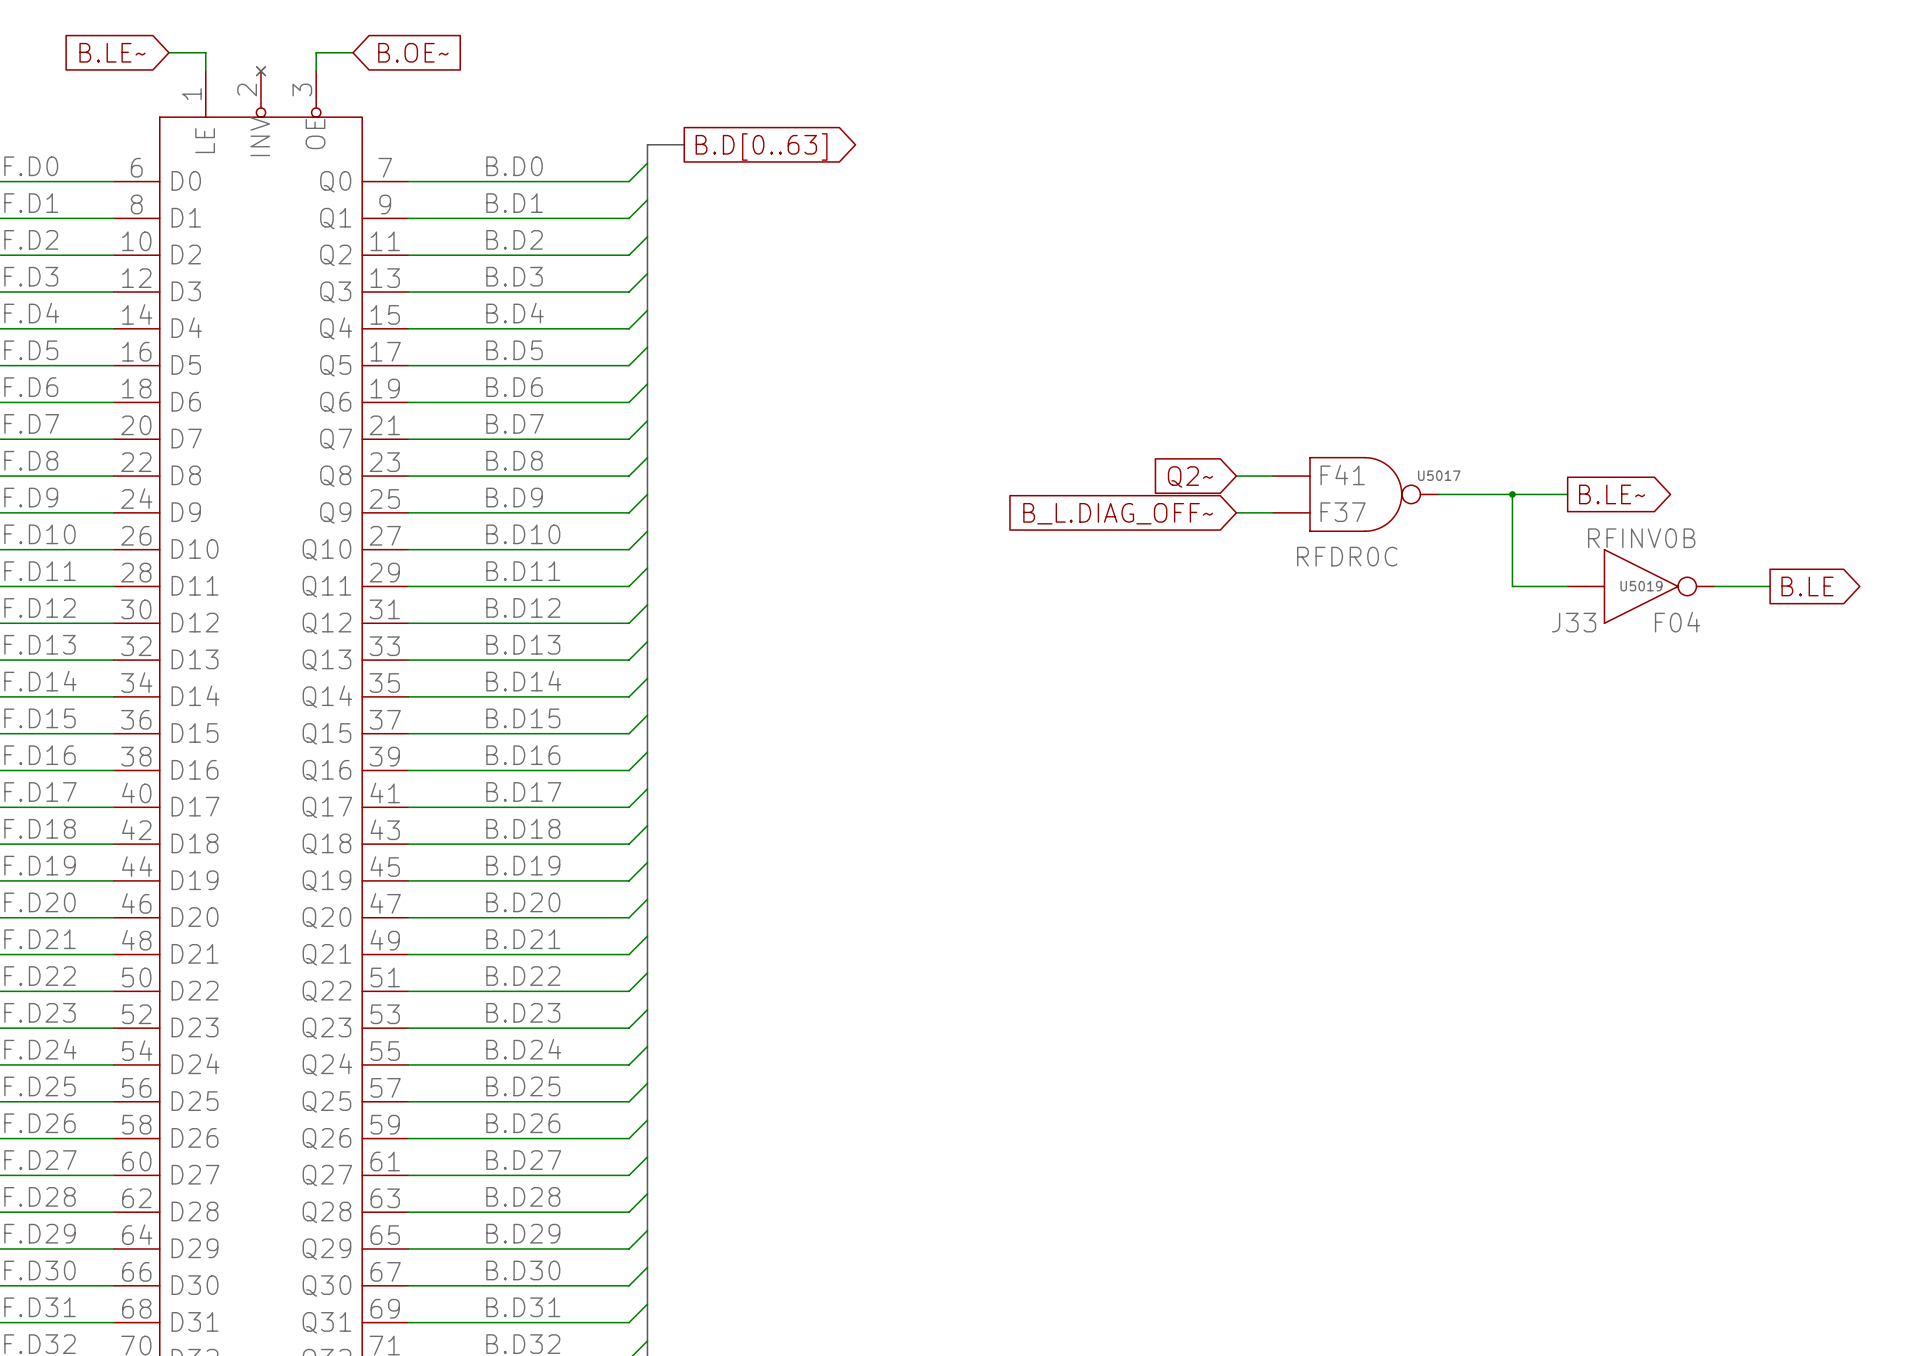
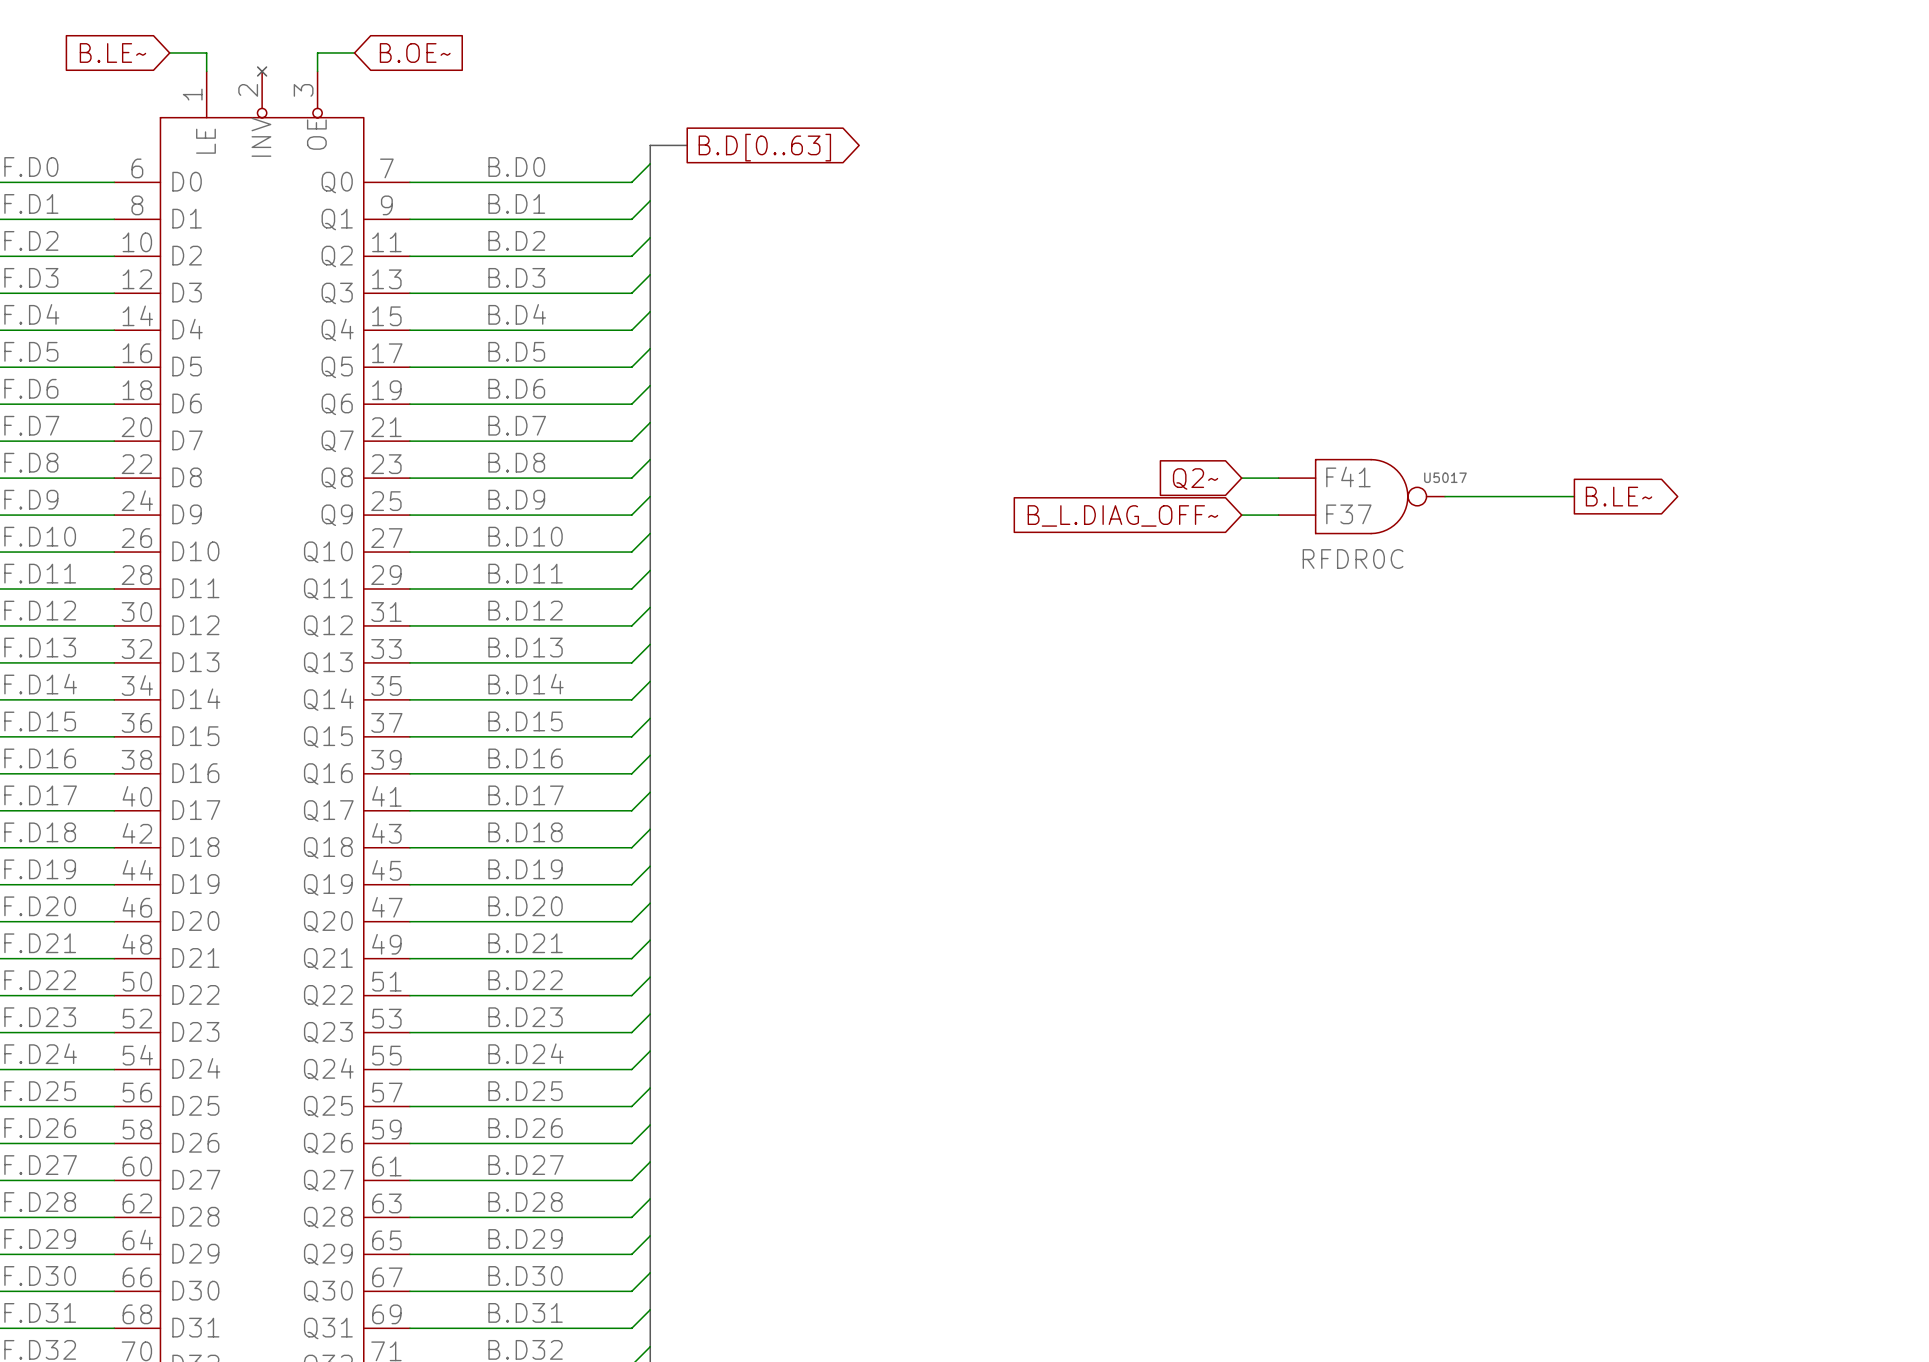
wire: (1512, 494) (1512, 586) (1567, 586) -> none
junction: (1512, 494) -> none
U5019: F04 (1641, 586) -> none
wire: (1714, 586) (1770, 586) -> none
global label: B.LE (1807, 586) -> none

